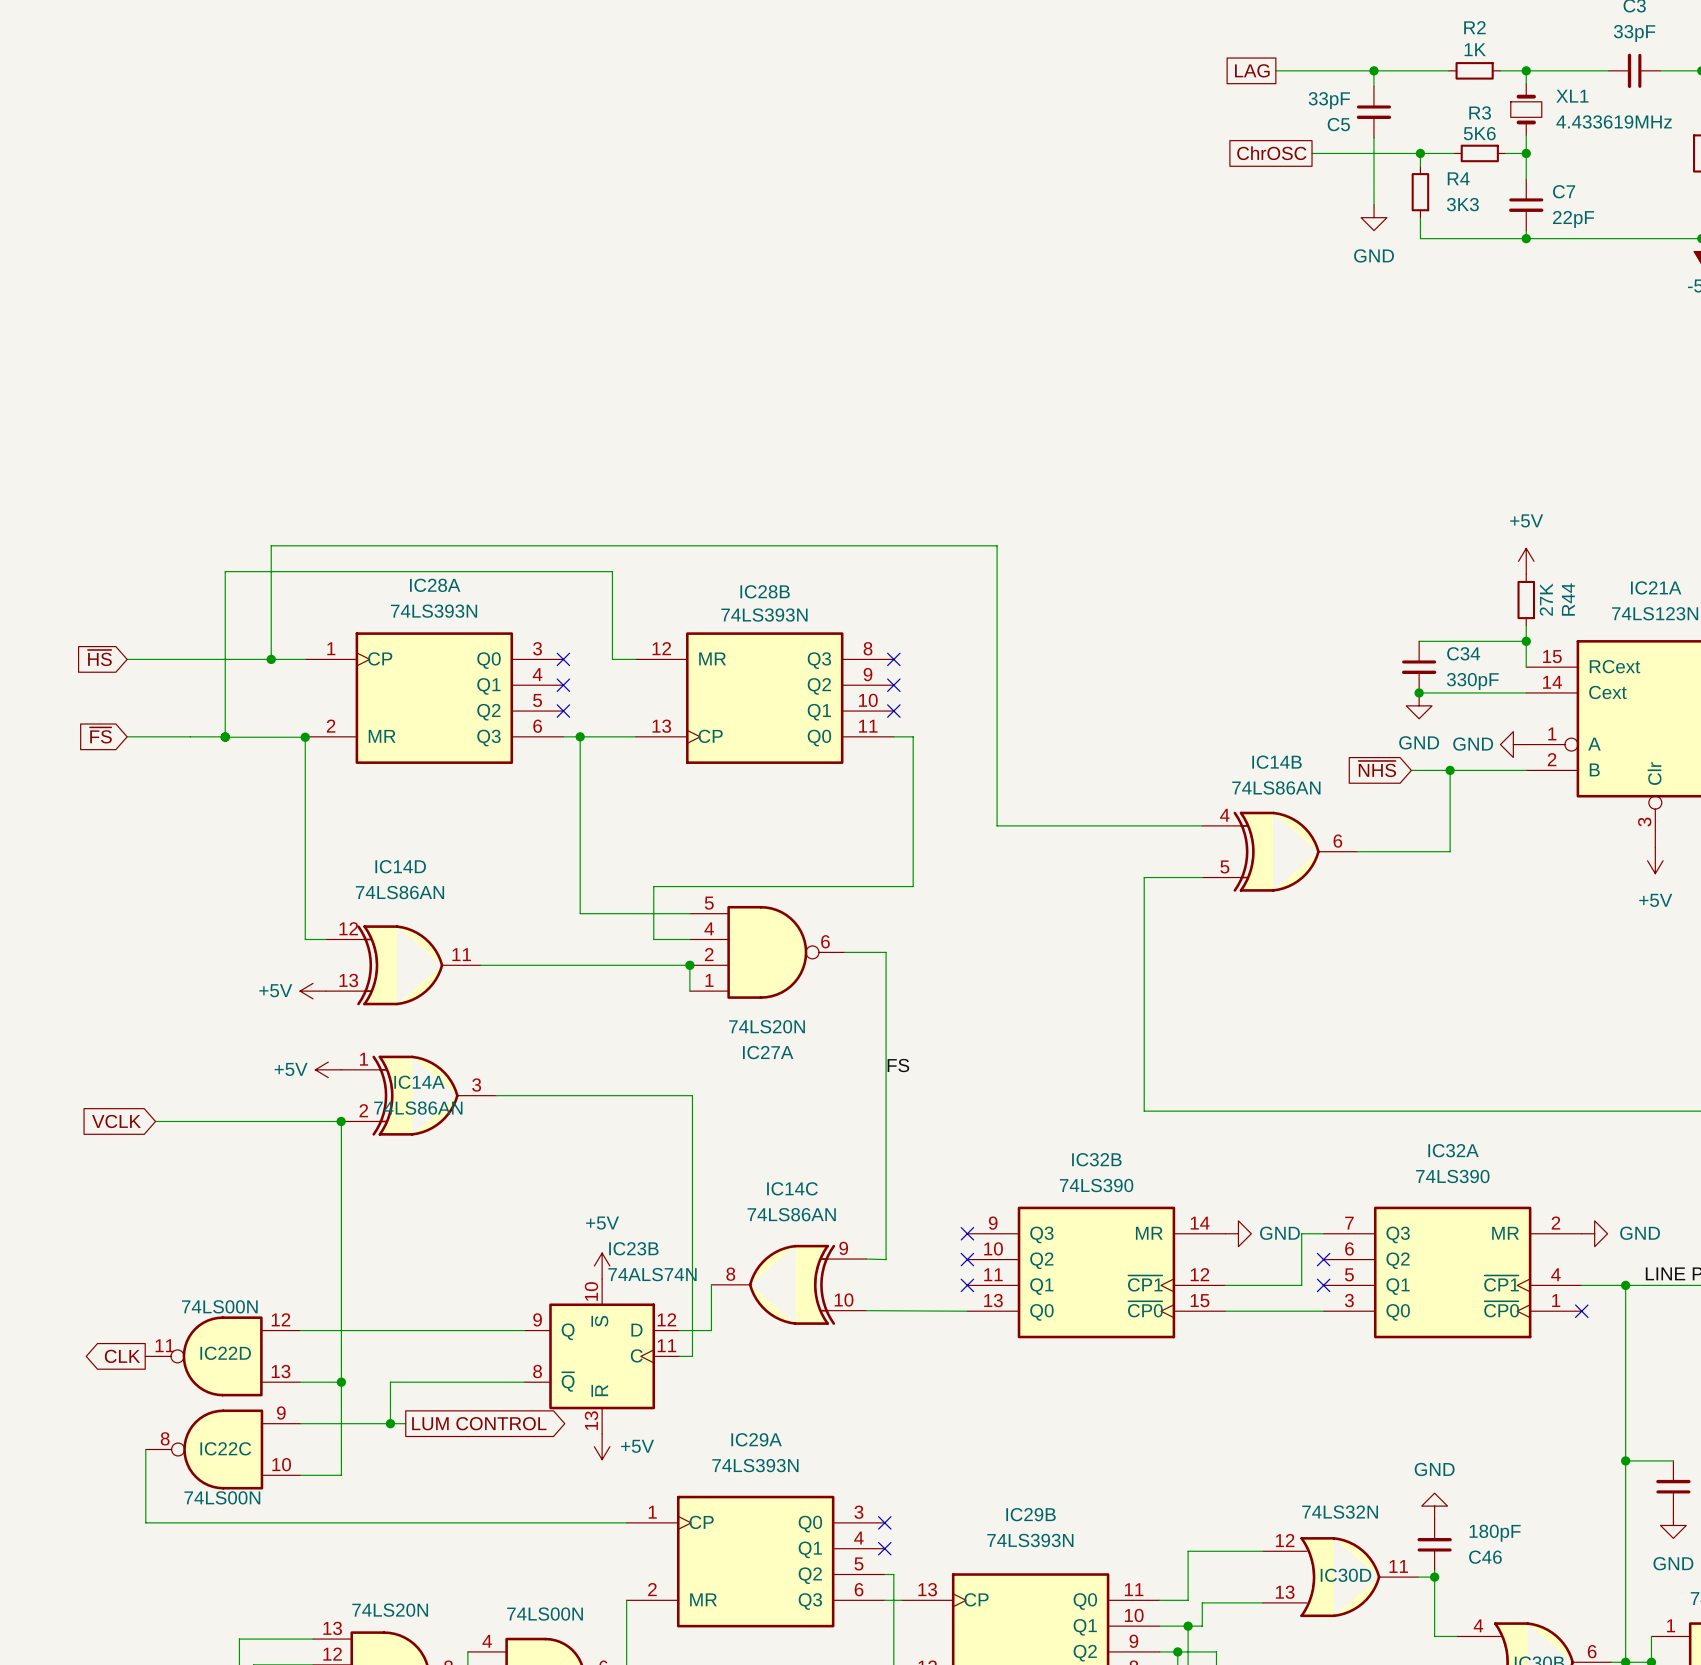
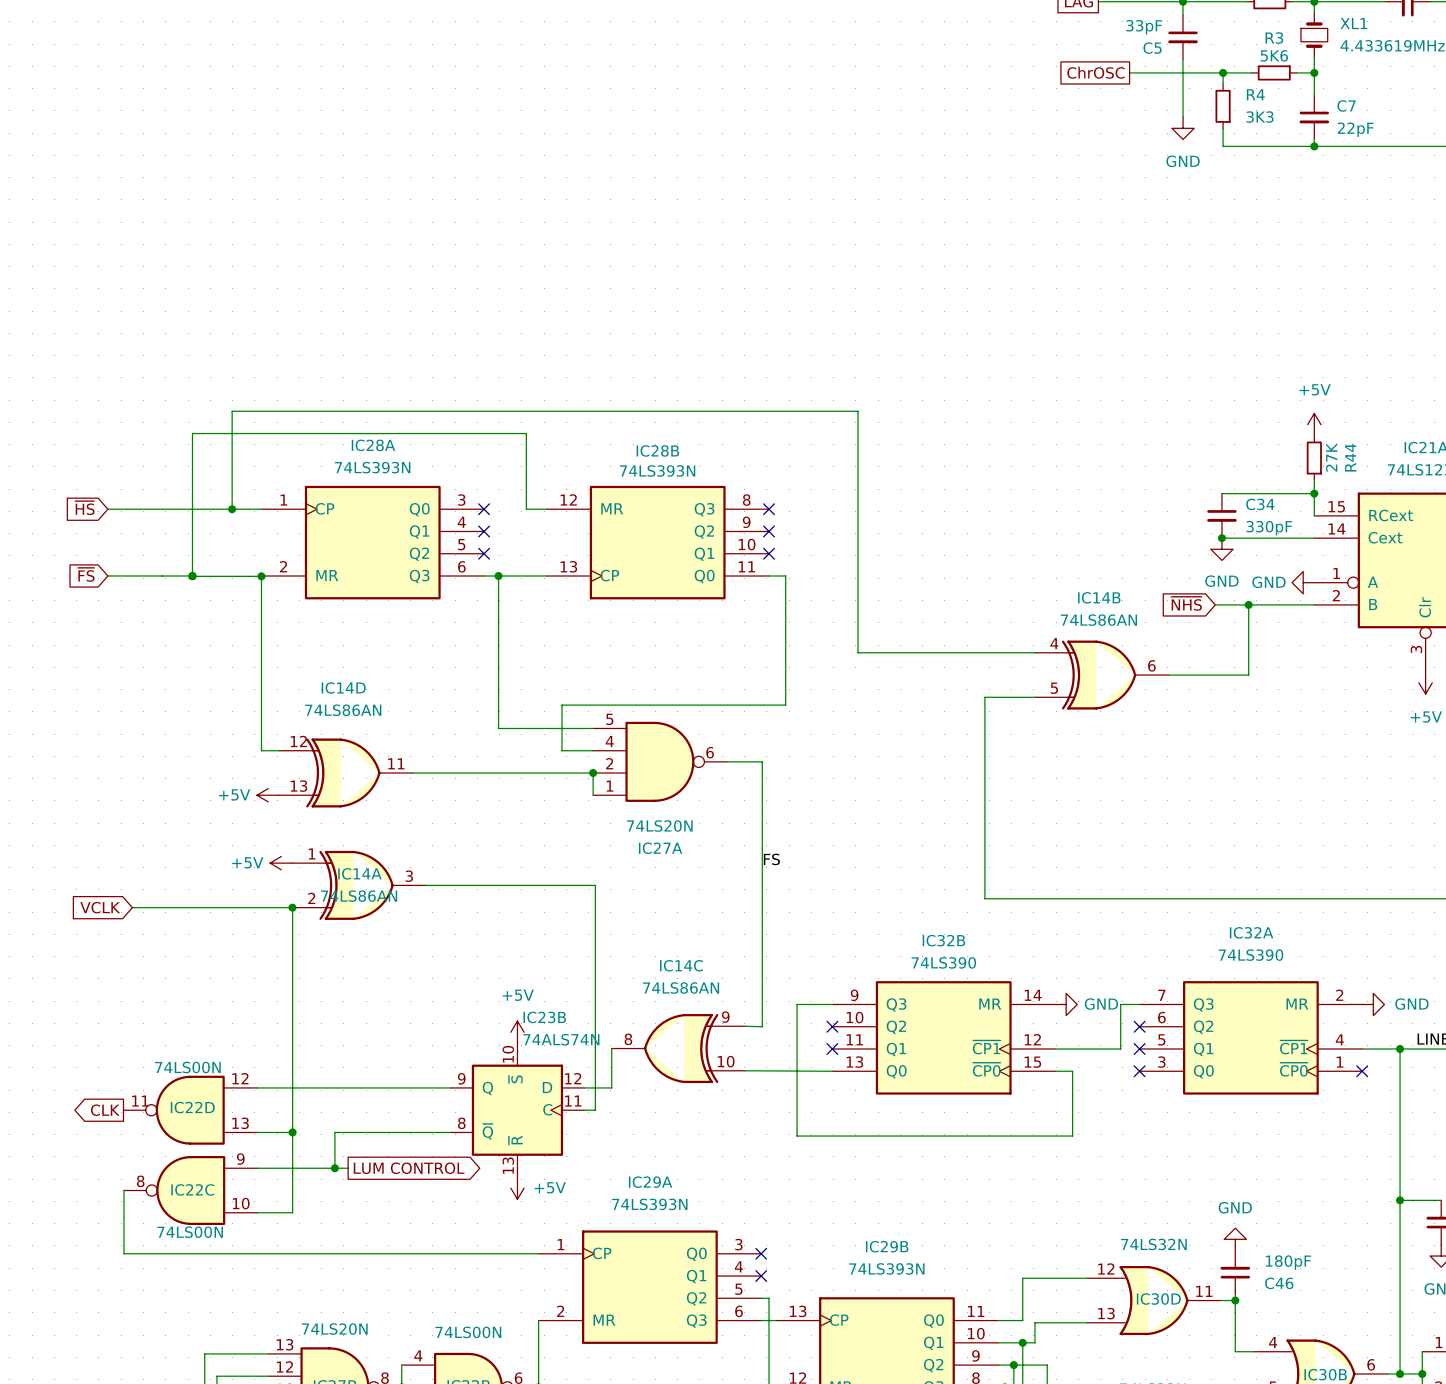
no-connect mark: (967, 1233) -> none
wire: (1245, 1311) (1323, 1311) -> (1072, 1071) (1072, 1136) (797, 1136) (797, 1004) (832, 1004)
no-connect mark: none -> (1139, 1071)

